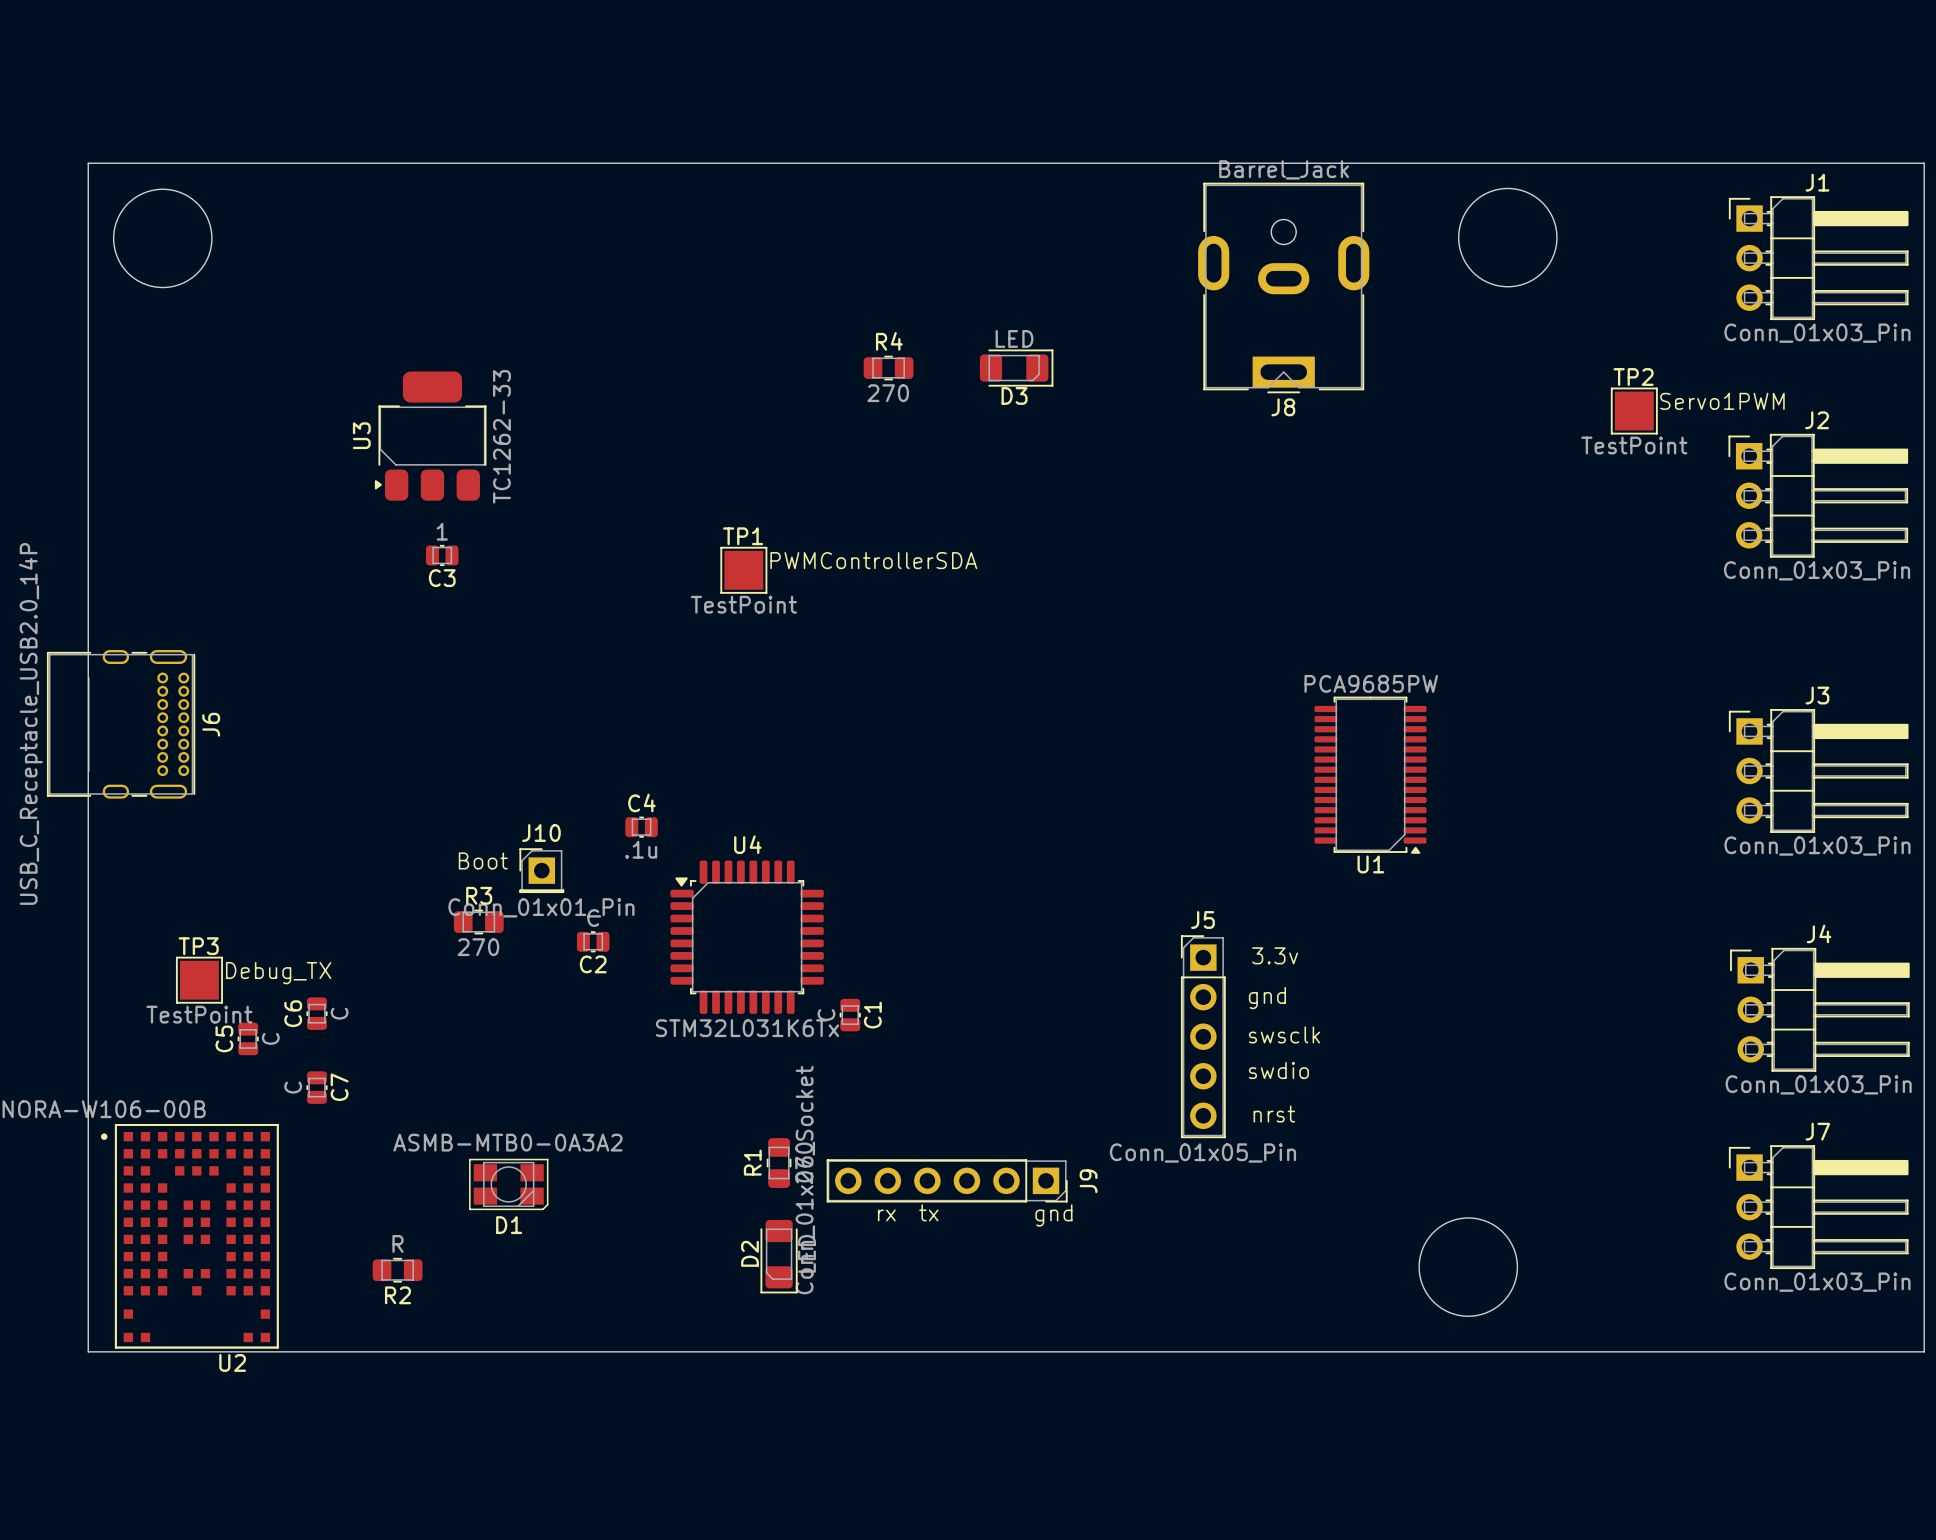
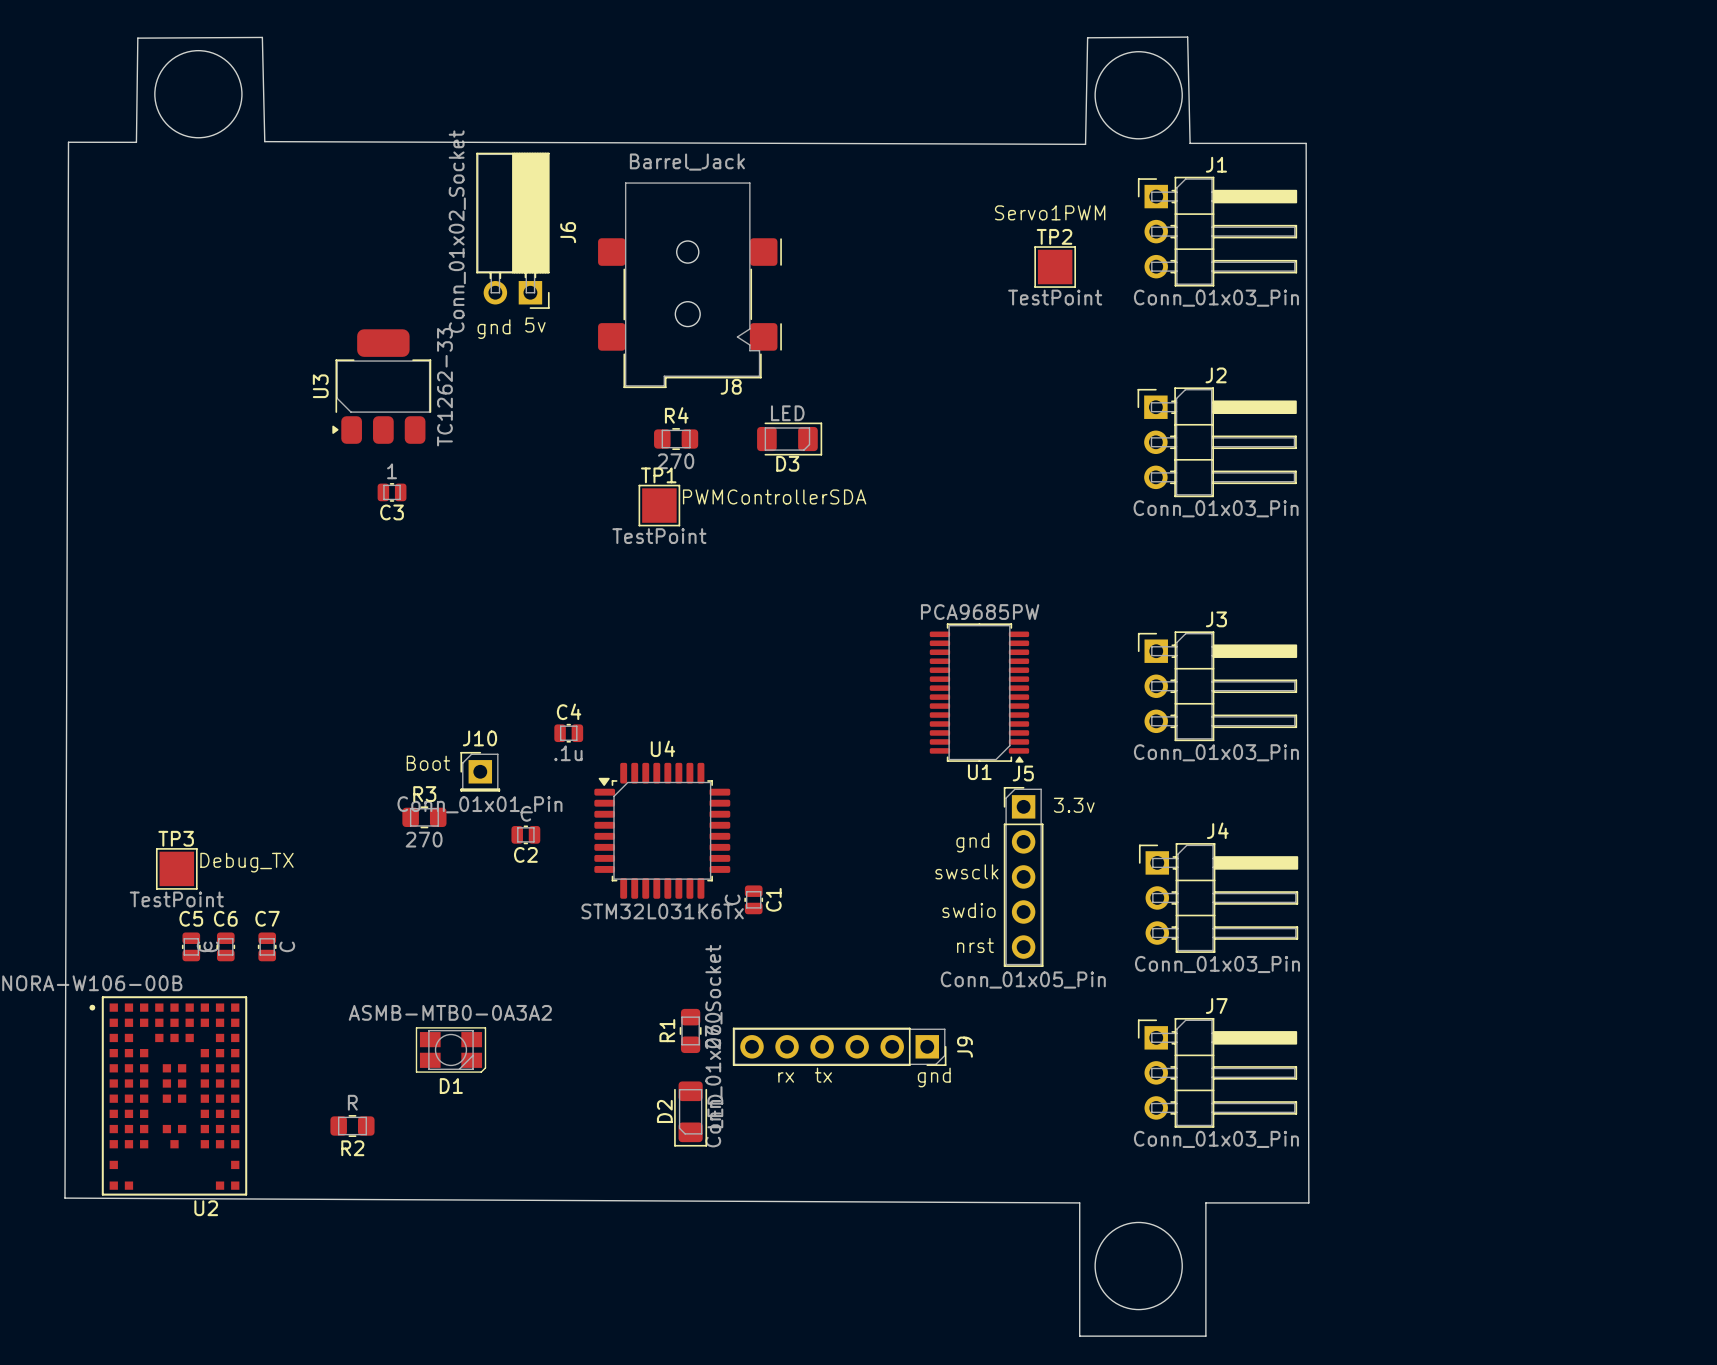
board edge: (88, 163) (1924, 163) (1924, 1351) (88, 1351) (88, 163) -> (1187, 37) (1087, 37) (1085, 144) (264, 141) (262, 37) (137, 38) (136, 142) (68, 142) (64, 1198) (1079, 1202) (1079, 1336) (1205, 1336) (1205, 1202) (1308, 1202) (1306, 143) (1190, 143) (1187, 37)
J8 footprint: [1198, 182, 1370, 394] -> [598, 182, 782, 389]
round board edge position: (1507, 237) -> (1138, 95)
round board edge position: (162, 238) -> (198, 94)
text: none -> Servo1PWM (1050, 212)
J1 position: (1818, 258) -> (1217, 231)
text: none -> 5v (535, 325)
R4 position: (888, 368) -> (676, 439)
D3 position: (1016, 368) -> (789, 439)
text: none -> gnd (494, 329)
text: Servo1PWM (1722, 401) -> none
J8 name position: J8 (1283, 407) -> J8 (731, 386)
TP2 position: (1634, 411) -> (1055, 267)
J2 position: (1818, 495) -> (1217, 442)
J6 footprint: [46, 649, 196, 799] -> [476, 152, 550, 309]
J6 value: USB_C_Receptacle_USB2.0_14P (30, 723) -> Conn_01x02_Socket (457, 231)
J3 position: (1818, 770) -> (1217, 686)
U1 position: (1370, 775) -> (979, 692)
text position: 3.3v (1275, 955) -> 3.3v (1074, 805)
text position: gnd (1267, 997) -> gnd (972, 842)
J4 position: (1819, 1009) -> (1218, 897)
C6 name rotation: 0° (293, 1013) -> 90° clockwise (225, 918)
C6 name position: C6 (293, 1013) -> C6 (225, 918)
C6 position: (316, 1013) -> (267, 946)
text position: swsclk (1284, 1034) -> swsclk (966, 871)
J5 position: (1203, 1036) -> (1023, 876)
C5 name rotation: 0° (224, 1038) -> 90° clockwise (191, 918)
C5 position: (248, 1038) -> (191, 946)
text position: swdio (1278, 1070) -> swdio (968, 910)
C7 position: (316, 1087) -> (225, 946)
C7 name rotation: 0° (339, 1087) -> 90° clockwise (267, 918)
text position: nrst (1274, 1114) -> nrst (975, 945)
J7 position: (1818, 1207) -> (1217, 1072)
round board edge position: (1468, 1267) -> (1138, 1266)

